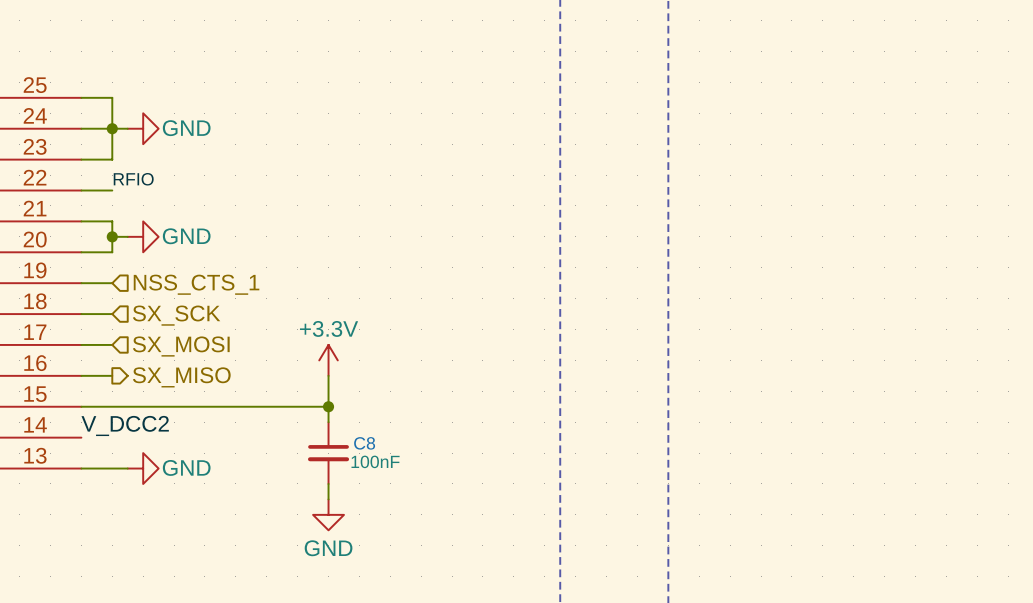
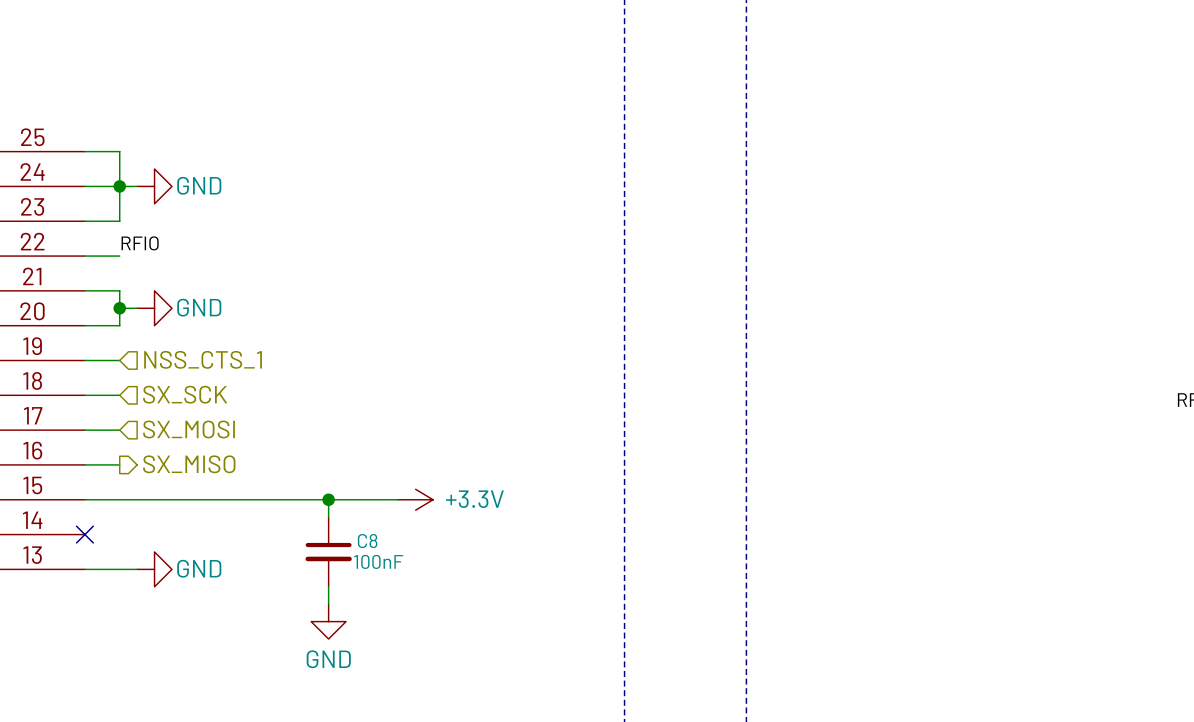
power symbol rotation: 0° (328, 360) -> 90° clockwise (415, 499)
power symbol position: +3.3V (328, 360) -> +3.3V (415, 499)
wire: (328, 375) (328, 422) -> none
wire: none -> (328, 499) (328, 517)
wire: none -> (363, 499) (398, 499)
junction position: (328, 406) -> (328, 499)
label: V_DCC2 (125, 425) -> none
no-connect mark: none -> (84, 534)
C8 position: (328, 453) -> (328, 551)
wire: (328, 483) (328, 499) -> (328, 586) (328, 604)
power symbol position: GND (328, 514) -> GND (328, 621)

